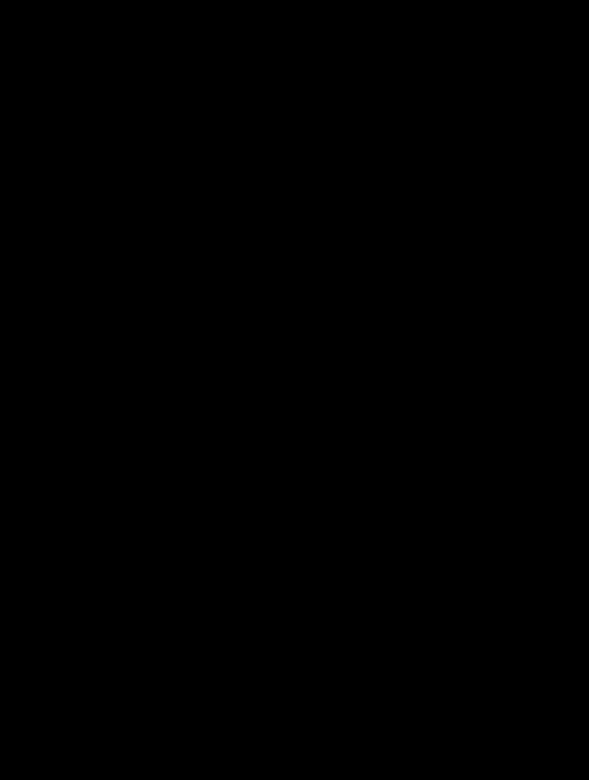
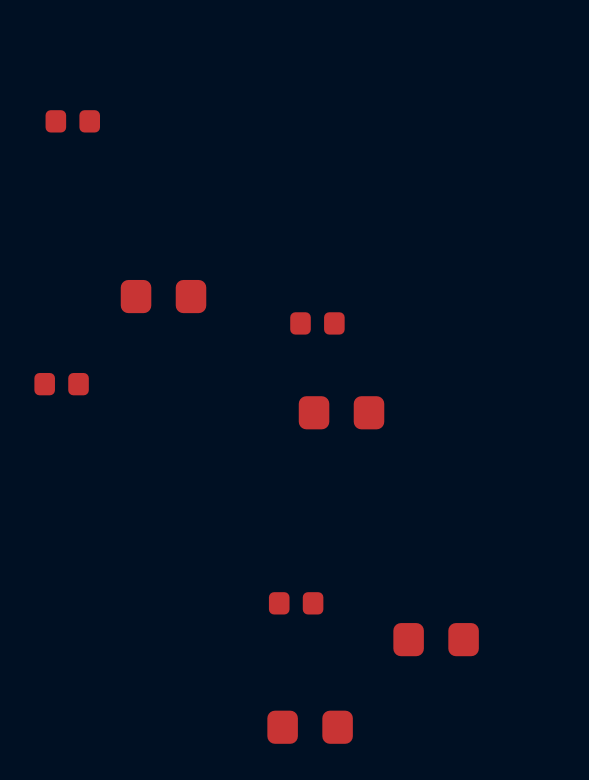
part: none -> (72, 121)
part: none -> (163, 296)
part: none -> (317, 323)
part: none -> (61, 384)
part: none -> (341, 412)
part: none -> (296, 603)
part: none -> (436, 639)
part: none -> (310, 727)

